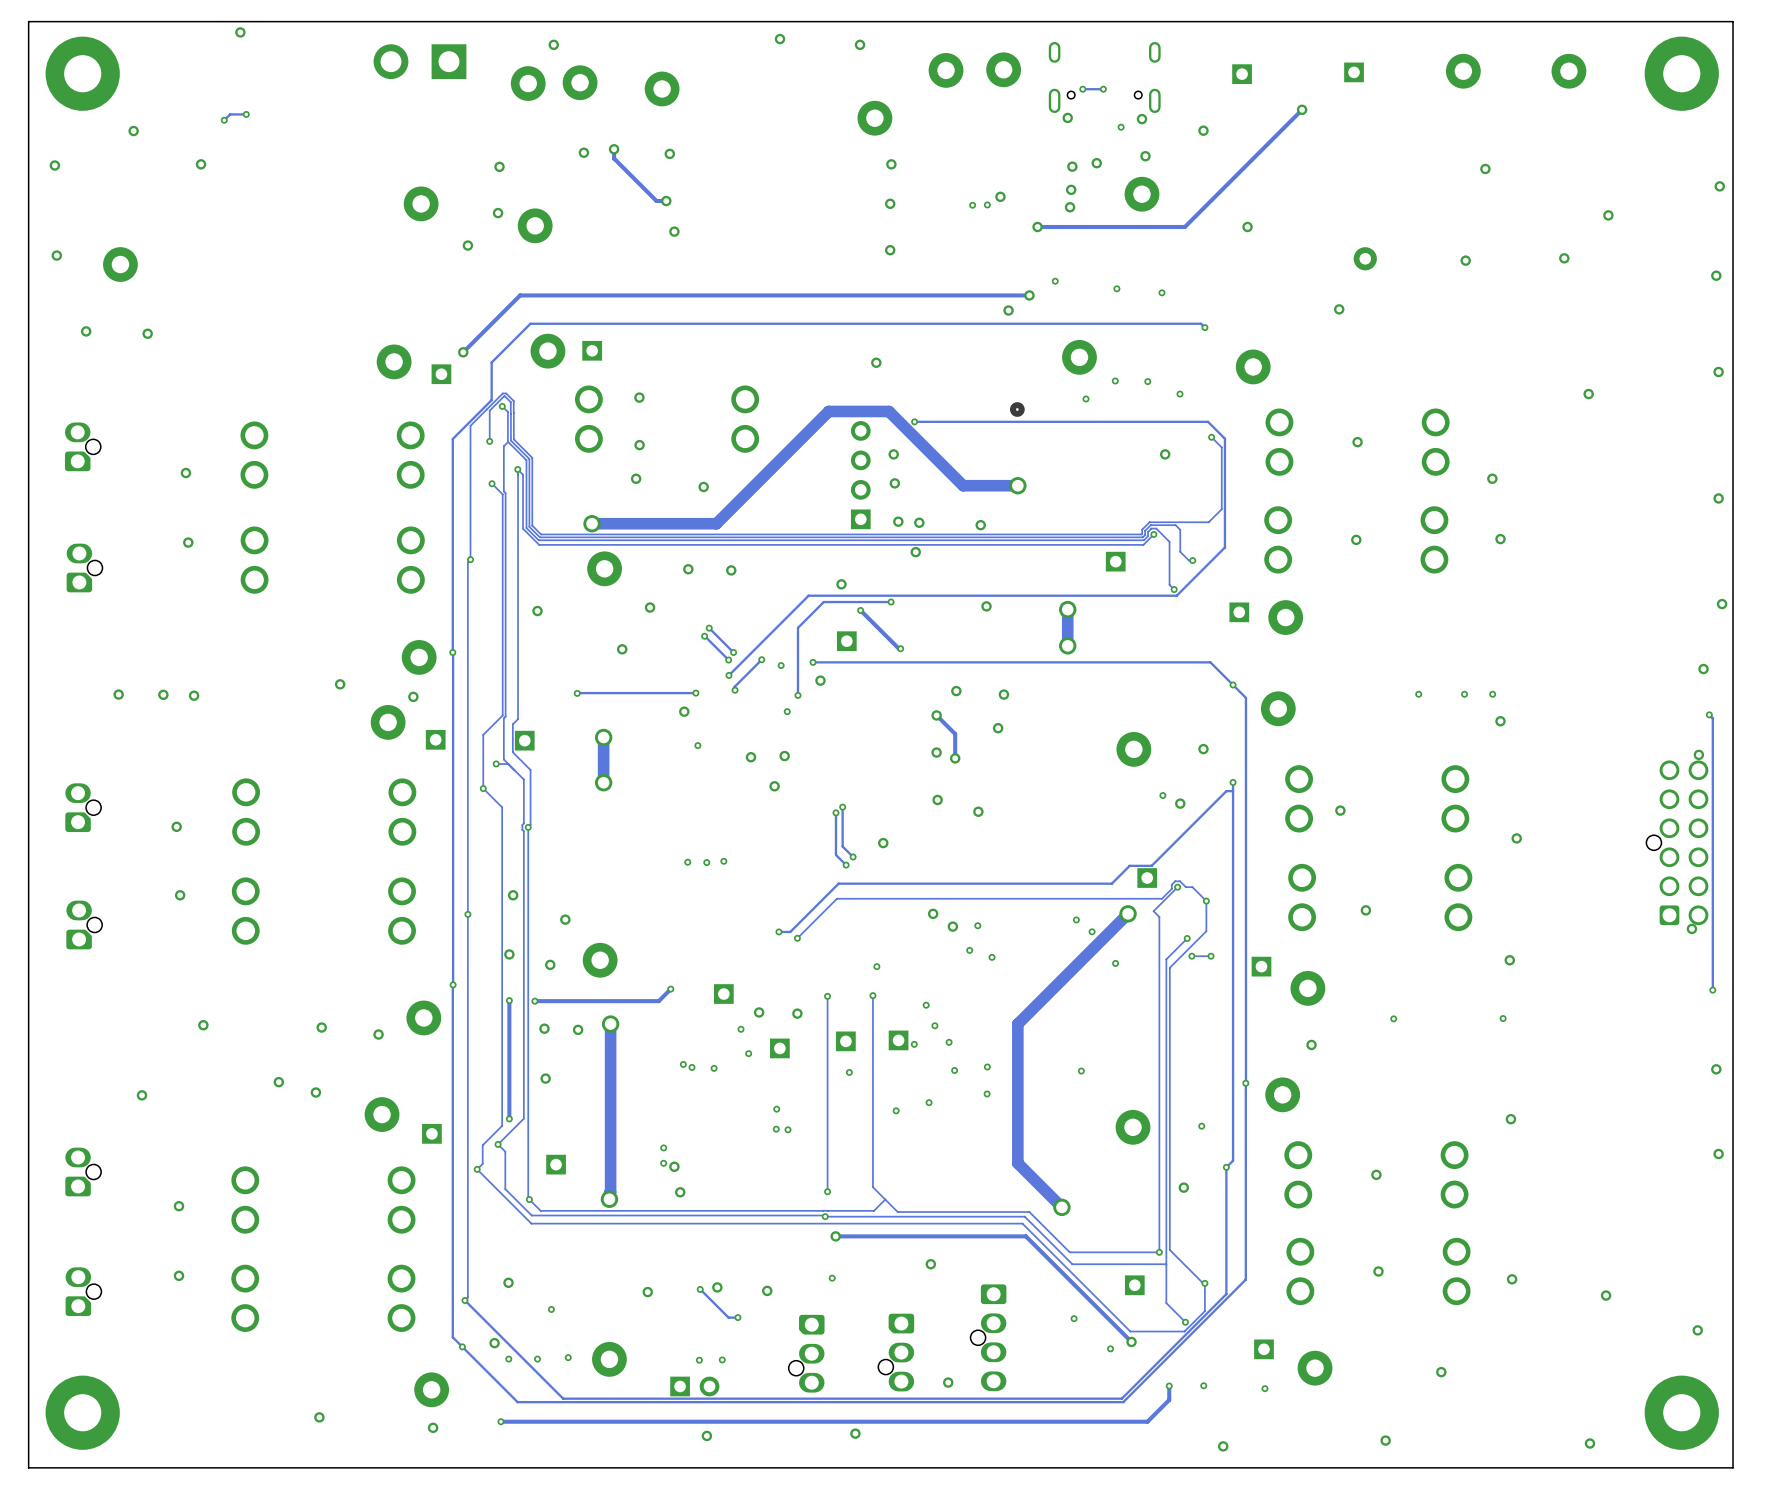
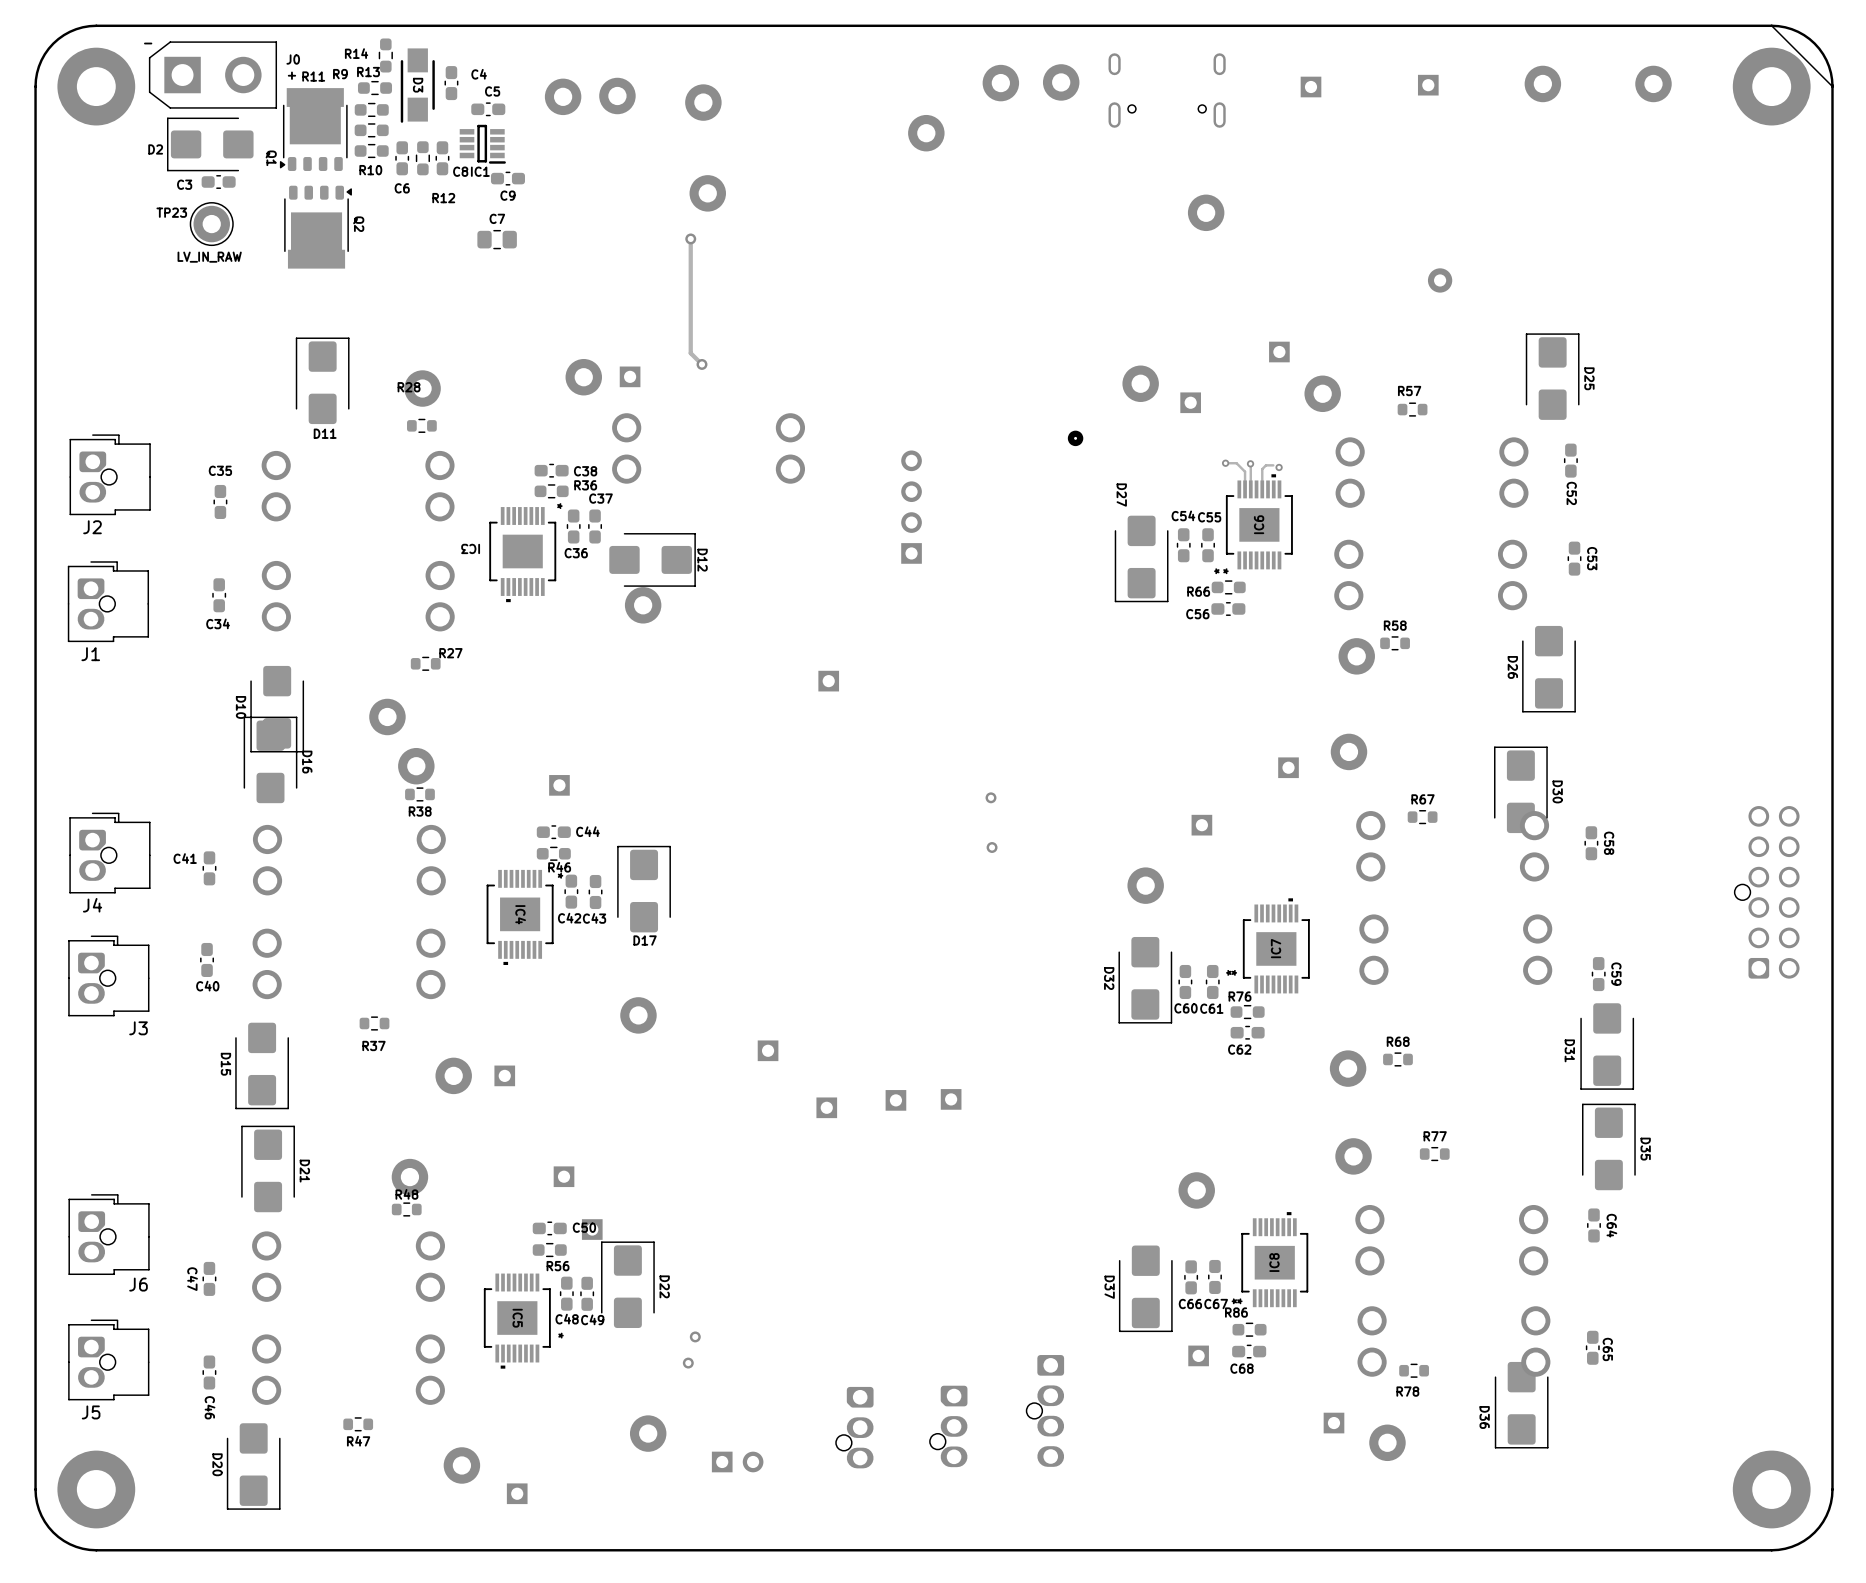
board edge: none -> (1771, 25) (96, 25) (76, 29) (58, 39) (48, 48) (41, 60) (37, 73) (35, 86) (35, 1489) (38, 1509) (48, 1527) (58, 1537) (69, 1544) (82, 1548) (96, 1550) (1771, 1550) (1791, 1546) (1809, 1537) (1819, 1527) (1826, 1515) (1830, 1503) (1832, 1489) (1832, 85)
board edge: none -> (1771, 25) (1832, 86) (1829, 66) (1823, 54) (1814, 43) (1804, 35) (1791, 29) (1771, 25)
board edge: (1733, 21) (28, 21) (28, 1467) (1733, 1467) (1733, 21) -> none
via: (240, 32) -> none
via: (780, 39) -> none
R14: none -> (385, 55)
via: (553, 44) -> none
via: (860, 44) -> none
J0 side: top (419, 61) -> bottom (212, 75)
C4: none -> (451, 83)
D3: none -> (417, 85)
R13: none -> (374, 88)
via: (1082, 89) -> none
track: (1103, 89) (1082, 89) -> none
via: (1103, 89) -> none
C5: none -> (488, 109)
R9: none -> (371, 109)
track: (1302, 109) (1184, 226) (1037, 226) -> none
via: (1302, 109) -> none
track: (246, 114) (230, 114) (224, 120) -> none
via: (246, 114) -> none
Q1: none -> (313, 129)
R11: none -> (371, 130)
via: (1067, 117) -> none
via: (1141, 119) -> none
via: (224, 120) -> none
via: (1121, 127) -> none
D2: none -> (210, 144)
IC1: none -> (482, 144)
via: (1203, 130) -> none
via: (133, 131) -> none
R10: none -> (371, 151)
C6: none -> (402, 158)
R12: none -> (422, 158)
C8: none -> (442, 158)
track: (614, 149) (614, 158) (656, 201) (666, 201) -> none
via: (614, 149) -> none
via: (583, 152) -> none
via: (669, 153) -> none
via: (1145, 156) -> none
C9: none -> (507, 178)
via: (1096, 163) -> none
C3: none -> (218, 182)
via: (201, 164) -> none
via: (891, 164) -> none
via: (54, 165) -> none
via: (499, 166) -> none
via: (1072, 166) -> none
via: (1485, 168) -> none
via: (1719, 186) -> none
via: (1071, 189) -> none
via: (1000, 196) -> none
via: (666, 201) -> none
TP23 side: top (421, 203) -> bottom (211, 224)
via: (890, 203) -> none
via: (987, 204) -> none
via: (972, 205) -> none
Q2: none -> (318, 227)
via: (1070, 207) -> none
via: (498, 213) -> none
via: (1608, 215) -> none
C7: none -> (497, 239)
track: none -> (690, 238) (690, 353) (701, 364)
via: none -> (690, 238)
part position: (535, 225) -> (707, 193)
via: (1037, 226) -> none
via: (1247, 226) -> none
via: (674, 231) -> none
via: (467, 245) -> none
via: (890, 250) -> none
via: (56, 255) -> none
via: (1564, 258) -> none
via: (1465, 260) -> none
part: (120, 264) -> none
via: (1716, 275) -> none
via: (1055, 281) -> none
via: (1116, 288) -> none
via: (1162, 292) -> none
track: (1029, 295) (520, 295) (463, 352) -> none
via: (1029, 295) -> none
via: (1339, 309) -> none
via: (1008, 310) -> none
track: (1204, 327) (1201, 323) (530, 323) (491, 362) (491, 400) (452, 438) (452, 1337) (517, 1402) (1123, 1402) (1245, 1279) (1245, 1083) -> none
via: (1204, 327) -> none
part: none -> (1279, 352)
via: (86, 331) -> none
via: (147, 333) -> none
via: none -> (701, 364)
D25: none -> (1552, 376)
via: (463, 352) -> none
D11: none -> (322, 380)
via: (876, 362) -> none
via: (1718, 372) -> none
part: (441, 374) -> none
part: none -> (1190, 402)
via: (1115, 381) -> none
via: (1147, 381) -> none
R57: none -> (1412, 409)
via: (1179, 394) -> none
via: (1588, 394) -> none
R28: none -> (421, 425)
via: (639, 397) -> none
via: (1086, 398) -> none
track: (502, 406) (507, 412) (507, 442) -> none
via: (502, 406) -> none
track: (513, 412) (513, 400) (506, 393) (502, 393) (470, 425) (470, 559) (467, 562) (467, 1297) (465, 1300) (563, 1398) (1121, 1398) (1226, 1294) (1226, 1167) (1233, 1160) (1233, 782) -> none
track: (513, 412) (513, 439) (532, 457) (532, 525) (541, 534) (1141, 534) (1142, 529) (1149, 522) (1208, 522) (1221, 509) (1221, 447) (1211, 437) -> none
track: (510, 413) (510, 402) (503, 396) (489, 410) (489, 441) -> none
track: (510, 414) (510, 440) (529, 459) (529, 526) (539, 537) (1142, 537) (1145, 530) (1150, 525) (1175, 525) (1180, 529) (1180, 551) (1188, 560) (1192, 560) -> none
track: (914, 421) (1208, 421) (1224, 438) (1224, 547) (1176, 595) (808, 595) (728, 675) -> none
via: (914, 421) -> none
C52: none -> (1570, 460)
track: none -> (1225, 463) (1236, 463) (1245, 471) (1245, 489)
via: none -> (1225, 463)
track: none -> (1250, 463) (1250, 489)
via: none -> (1250, 463)
track: none -> (1273, 465) (1266, 465) (1262, 469) (1262, 489)
C38: none -> (551, 470)
via: (489, 441) -> none
via: (1357, 442) -> none
via: (639, 445) -> none
J1 side: top (82, 446) -> bottom (108, 601)
via: (893, 454) -> none
via: (1165, 454) -> none
R36: none -> (551, 491)
via: (517, 469) -> none
C35: none -> (220, 501)
via: (185, 473) -> none
via: (636, 478) -> none
via: (1492, 478) -> none
track: (492, 483) (502, 494) (502, 715) (483, 734) (483, 788) (502, 807) (502, 1125) (482, 1145) (482, 1163) (477, 1169) (531, 1223) (1022, 1223) (1130, 1331) (1184, 1331) (1204, 1311) (1204, 1283) (1169, 1250) (1169, 967) (1206, 931) (1206, 901) (1192, 887) (1185, 887) (1180, 881) (1175, 881) (1171, 884) (1171, 888) (1161, 898) (836, 898) (797, 938) -> none
via: (492, 483) -> none
via: (894, 483) -> none
track: (1017, 485) (963, 485) (888, 411) (828, 411) (716, 523) (592, 523) -> none
via: (1017, 485) -> none
via: (703, 486) -> none
IC6: none -> (1259, 521)
C36: none -> (573, 526)
C37: none -> (595, 526)
via: (1718, 498) -> none
C54: none -> (1183, 545)
C55: none -> (1208, 545)
IC3: none -> (522, 554)
via: (898, 521) -> none
via: (919, 522) -> none
via: (592, 523) -> none
D27: none -> (1141, 558)
C53: none -> (1574, 558)
D12: none -> (652, 559)
via: (980, 525) -> none
track: (1153, 534) (1143, 544) (539, 544) (523, 528) (523, 474) (517, 469) (518, 719) (512, 724) (512, 752) (530, 769) (530, 824) (528, 827) (528, 1198) (540, 1210) (822, 1210) -> none
via: (1153, 534) -> none
via: (1356, 539) -> none
via: (1500, 539) -> none
via: (188, 542) -> none
R66: none -> (1228, 587)
via: (915, 552) -> none
C34: none -> (219, 595)
via: (470, 559) -> none
via: (1192, 560) -> none
part: (1115, 561) -> none
J2 side: top (84, 567) -> bottom (110, 474)
via: (688, 569) -> none
via: (731, 570) -> none
C56: none -> (1228, 608)
via: (841, 584) -> none
track: (1174, 589) (1169, 584) (1169, 541) (1156, 528) (1151, 528) (1143, 540) (538, 540) (526, 528) (526, 460) (508, 441) (503, 446) (503, 491) (505, 493) (503, 759) (523, 779) (522, 824) (523, 1118) (498, 1144) (505, 1151) (505, 1189) (531, 1215) (1024, 1216) (1072, 1264) (1166, 1264) -> none
via: (1174, 589) -> none
track: (891, 602) (823, 602) (797, 627) (797, 695) -> none
via: (891, 602) -> none
via: (1722, 604) -> none
R58: none -> (1395, 643)
via: (986, 606) -> none
via: (650, 607) -> none
track: (1067, 609) (1067, 645) -> none
via: (1067, 609) -> none
track: (860, 610) (900, 648) -> none
via: (860, 610) -> none
via: (537, 611) -> none
part: (1239, 612) -> none
R27: none -> (425, 663)
track: (709, 628) (733, 652) -> none
via: (709, 628) -> none
D26: none -> (1549, 669)
track: (704, 636) (728, 660) -> none
via: (704, 636) -> none
part position: (846, 641) -> (828, 681)
via: (1067, 645) -> none
via: (900, 648) -> none
via: (622, 649) -> none
via: (452, 652) -> none
via: (733, 652) -> none
part position: (419, 657) -> (387, 716)
track: (761, 659) (734, 686) (735, 690) -> none
via: (761, 659) -> none
via: (728, 660) -> none
track: (813, 662) (1210, 662) (1245, 697) (1245, 1083) -> none
via: (813, 662) -> none
via: (781, 665) -> none
D10: none -> (277, 709)
via: (1703, 669) -> none
via: (728, 675) -> none
via: (820, 680) -> none
via: (340, 684) -> none
via: (1233, 684) -> none
via: (735, 690) -> none
via: (956, 691) -> none
via: (577, 693) -> none
track: (695, 693) (577, 693) -> none
via: (695, 693) -> none
via: (118, 694) -> none
via: (163, 694) -> none
via: (1003, 694) -> none
via: (1418, 694) -> none
via: (1464, 694) -> none
via: (1492, 694) -> none
via: (194, 695) -> none
via: (797, 695) -> none
via: (413, 696) -> none
via: (684, 711) -> none
via: (787, 711) -> none
track: (1709, 714) (1712, 718) (1712, 990) -> none
via: (1709, 714) -> none
track: (936, 715) (955, 734) (955, 758) -> none
via: (936, 715) -> none
D16: none -> (270, 759)
via: (1500, 721) -> none
part: none -> (1288, 767)
via: (998, 728) -> none
track: (603, 737) (603, 782) -> none
via: (603, 737) -> none
part: (435, 739) -> none
D30: none -> (1520, 789)
via: (697, 745) -> none
R38: none -> (419, 794)
part position: (1133, 749) -> (1145, 885)
via: (1203, 749) -> none
via: (1698, 754) -> none
via: (784, 756) -> none
via: (750, 757) -> none
via: (955, 758) -> none
via: (496, 763) -> none
track: (508, 764) (498, 764) -> none
R67: none -> (1422, 817)
part: none -> (1201, 825)
via: (603, 782) -> none
via: (1233, 782) -> none
C44: none -> (553, 832)
via: (774, 786) -> none
via: (483, 788) -> none
track: (1233, 791) (1226, 791) (1151, 865) (1129, 865) (1111, 883) (838, 883) (790, 931) (778, 931) -> none
via: (1162, 795) -> none
C58: none -> (1591, 843)
via: (1180, 803) -> none
R46: none -> (553, 853)
J3 side: top (83, 807) -> bottom (108, 975)
track: (842, 807) (842, 846) (853, 856) -> none
via: (842, 807) -> none
via: (1340, 810) -> none
via: (978, 811) -> none
track: (835, 812) (835, 854) (846, 865) -> none
via: (835, 812) -> none
C41: none -> (209, 868)
via: (176, 826) -> none
via: (528, 827) -> none
via: (1516, 838) -> none
D17: none -> (644, 889)
C42: none -> (571, 891)
C43: none -> (595, 891)
via: (883, 843) -> none
via: (853, 856) -> none
via: (723, 861) -> none
via: (687, 862) -> none
via: (706, 862) -> none
via: (846, 865) -> none
IC4: none -> (520, 917)
part: (1147, 878) -> none
track: (1177, 887) (1153, 911) (1159, 917) (1159, 1252) (1069, 1252) (1029, 1212) (897, 1212) (872, 1187) (872, 995) -> none
via: (1177, 887) -> none
IC7: none -> (1276, 945)
via: (180, 895) -> none
via: (513, 895) -> none
via: (1206, 901) -> none
C40: none -> (207, 959)
via: (1365, 910) -> none
via: (933, 913) -> none
track: (1128, 913) (1017, 1024) (1017, 1163) (1061, 1207) -> none
via: (1128, 913) -> none
via: (467, 914) -> none
via: (565, 919) -> none
via: (1076, 919) -> none
C59: none -> (1598, 974)
J4 side: top (84, 924) -> bottom (109, 853)
via: (977, 925) -> none
via: (952, 926) -> none
D32: none -> (1145, 980)
C60: none -> (1185, 981)
C61: none -> (1212, 981)
via: (1691, 928) -> none
via: (778, 931) -> none
via: (1092, 931) -> none
via: (797, 938) -> none
track: (1187, 938) (1166, 959) (1166, 1303) (1185, 1322) -> none
via: (1187, 938) -> none
via: (969, 950) -> none
via: (509, 954) -> none
via: (1191, 956) -> none
track: (1210, 956) (1191, 956) -> none
via: (1211, 956) -> none
via: (992, 957) -> none
R76: none -> (1247, 1012)
via: (1509, 960) -> none
via: (1115, 963) -> none
via: (550, 964) -> none
via: (876, 966) -> none
part: (1261, 966) -> none
R37: none -> (374, 1023)
C62: none -> (1247, 1032)
via: (453, 984) -> none
part position: (1307, 988) -> (1348, 1068)
track: (670, 989) (658, 1001) (534, 1001) -> none
via: (670, 989) -> none
D31: none -> (1607, 1046)
via: (1712, 990) -> none
via: (872, 995) -> none
track: (827, 996) (827, 1191) -> none
via: (827, 996) -> none
track: (509, 1000) (509, 1118) -> none
via: (509, 1000) -> none
via: (534, 1001) -> none
R68: none -> (1397, 1059)
via: (926, 1005) -> none
D15: none -> (262, 1065)
via: (759, 1012) -> none
via: (797, 1013) -> none
part: none -> (504, 1075)
via: (1393, 1018) -> none
via: (1503, 1018) -> none
track: (610, 1024) (609, 1199) -> none
via: (610, 1024) -> none
via: (203, 1025) -> none
via: (934, 1025) -> none
via: (321, 1027) -> none
via: (544, 1028) -> none
via: (578, 1029) -> none
via: (741, 1029) -> none
via: (378, 1034) -> none
via: (949, 1042) -> none
via: (914, 1044) -> none
via: (1311, 1044) -> none
via: (748, 1053) -> none
via: (683, 1064) -> none
via: (987, 1066) -> none
via: (691, 1067) -> none
via: (714, 1068) -> none
via: (1716, 1069) -> none
via: (954, 1070) -> none
via: (1081, 1071) -> none
via: (849, 1072) -> none
via: (545, 1078) -> none
via: (278, 1082) -> none
via: (1245, 1083) -> none
D35: none -> (1608, 1146)
via: (315, 1092) -> none
R77: none -> (1434, 1154)
via: (987, 1093) -> none
via: (142, 1095) -> none
via: (929, 1102) -> none
D21: none -> (268, 1168)
via: (776, 1109) -> none
via: (896, 1110) -> none
part: none -> (564, 1176)
via: (509, 1118) -> none
via: (1510, 1119) -> none
via: (1201, 1126) -> none
via: (776, 1129) -> none
via: (788, 1129) -> none
part: (431, 1133) -> none
via: (498, 1144) -> none
R48: none -> (406, 1209)
via: (663, 1147) -> none
via: (1718, 1154) -> none
C64: none -> (1593, 1225)
C50: none -> (549, 1228)
via: (663, 1163) -> none
via: (674, 1166) -> none
via: (1226, 1167) -> none
via: (477, 1169) -> none
J5 side: top (83, 1171) -> bottom (108, 1359)
via: (1376, 1174) -> none
R56: none -> (549, 1250)
via: (1183, 1187) -> none
via: (827, 1191) -> none
via: (680, 1192) -> none
IC8: none -> (1274, 1259)
via: (529, 1199) -> none
via: (609, 1199) -> none
track: (885, 1199) (873, 1210) (827, 1210) -> none
via: (179, 1206) -> none
via: (1061, 1207) -> none
C67: none -> (1214, 1276)
track: (827, 1210) (822, 1210) -> none
C66: none -> (1191, 1277)
C47: none -> (209, 1278)
via: (825, 1216) -> none
D22: none -> (627, 1284)
D37: none -> (1145, 1288)
C48: none -> (566, 1293)
C49: none -> (587, 1293)
track: (835, 1236) (1025, 1236) (1131, 1341) -> none
via: (835, 1236) -> none
IC5: none -> (517, 1321)
via: (1159, 1252) -> none
R86: none -> (1249, 1329)
via: (930, 1264) -> none
via: none -> (695, 1336)
via: (1378, 1271) -> none
via: (179, 1275) -> none
C65: none -> (1592, 1347)
via: (832, 1278) -> none
via: (1512, 1279) -> none
C68: none -> (1249, 1351)
via: (508, 1282) -> none
via: (1204, 1283) -> none
via: (717, 1287) -> none
track: (700, 1289) (728, 1317) (737, 1317) -> none
via: (700, 1289) -> none
via: (767, 1290) -> none
J6 side: top (83, 1291) -> bottom (109, 1234)
via: (1606, 1295) -> none
R78: none -> (1414, 1370)
via: (465, 1300) -> none
C46: none -> (209, 1372)
via: (551, 1309) -> none
via: (737, 1317) -> none
via: (1074, 1318) -> none
via: (1185, 1322) -> none
via: (1697, 1330) -> none
D36: none -> (1521, 1405)
via: (1131, 1341) -> none
via: (494, 1343) -> none
via: (462, 1346) -> none
via: (1110, 1348) -> none
R47: none -> (358, 1424)
via: (568, 1357) -> none
via: (508, 1359) -> none
via: (537, 1359) -> none
via: (722, 1359) -> none
via: (699, 1360) -> none
via: (1441, 1372) -> none
via: (948, 1382) -> none
via: (1203, 1385) -> none
track: (1169, 1386) (1169, 1399) (1147, 1421) (500, 1421) -> none
via: (1169, 1386) -> none
via: (1264, 1388) -> none
D20: none -> (253, 1466)
part: none -> (517, 1493)
via: (319, 1417) -> none
via: (500, 1421) -> none
via: (433, 1427) -> none
via: (855, 1433) -> none
via: (706, 1435) -> none
via: (1385, 1440) -> none
via: (1589, 1443) -> none
via: (1223, 1446) -> none

